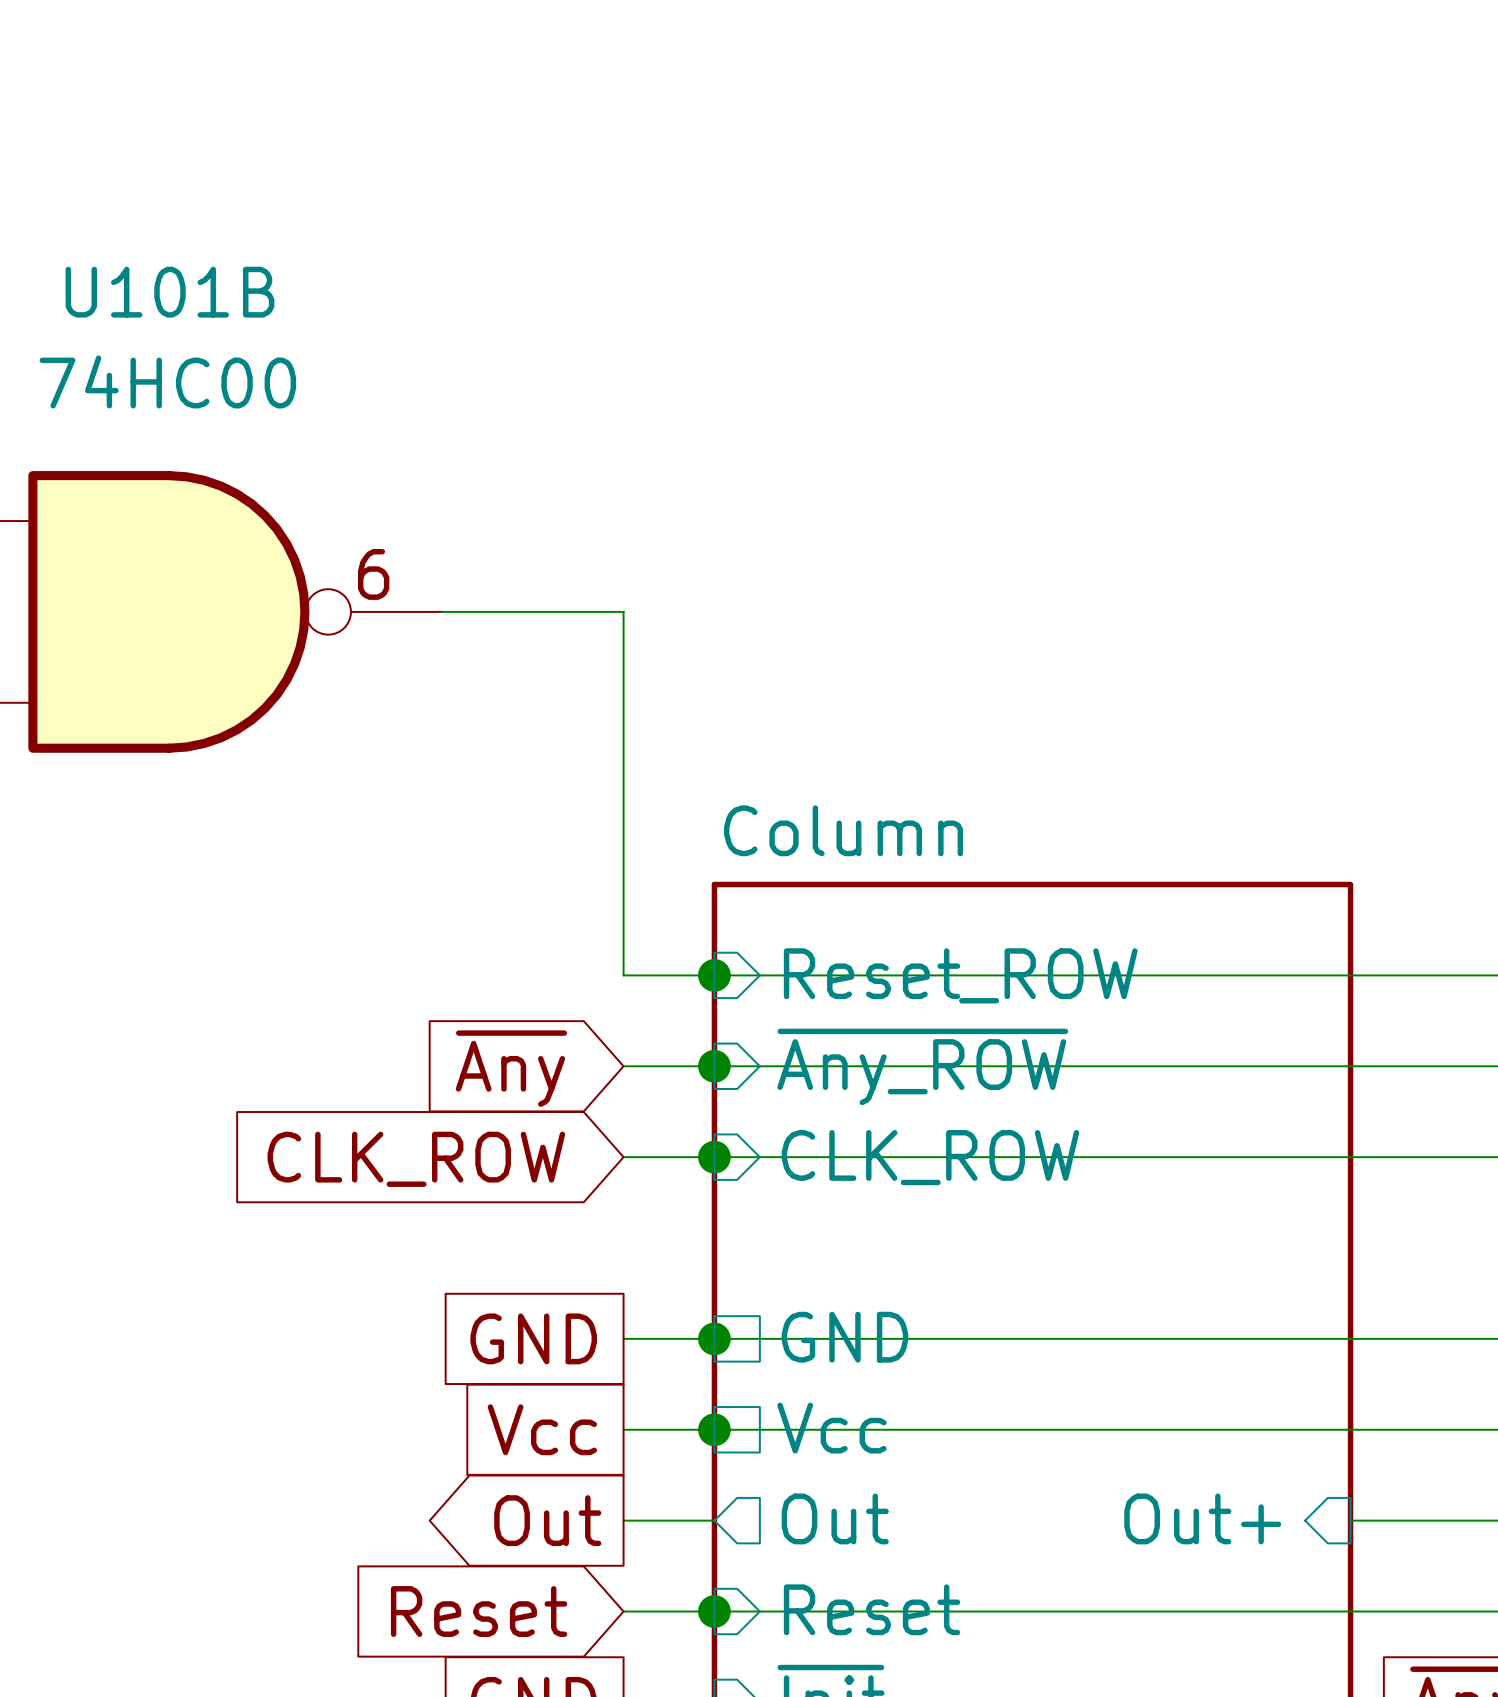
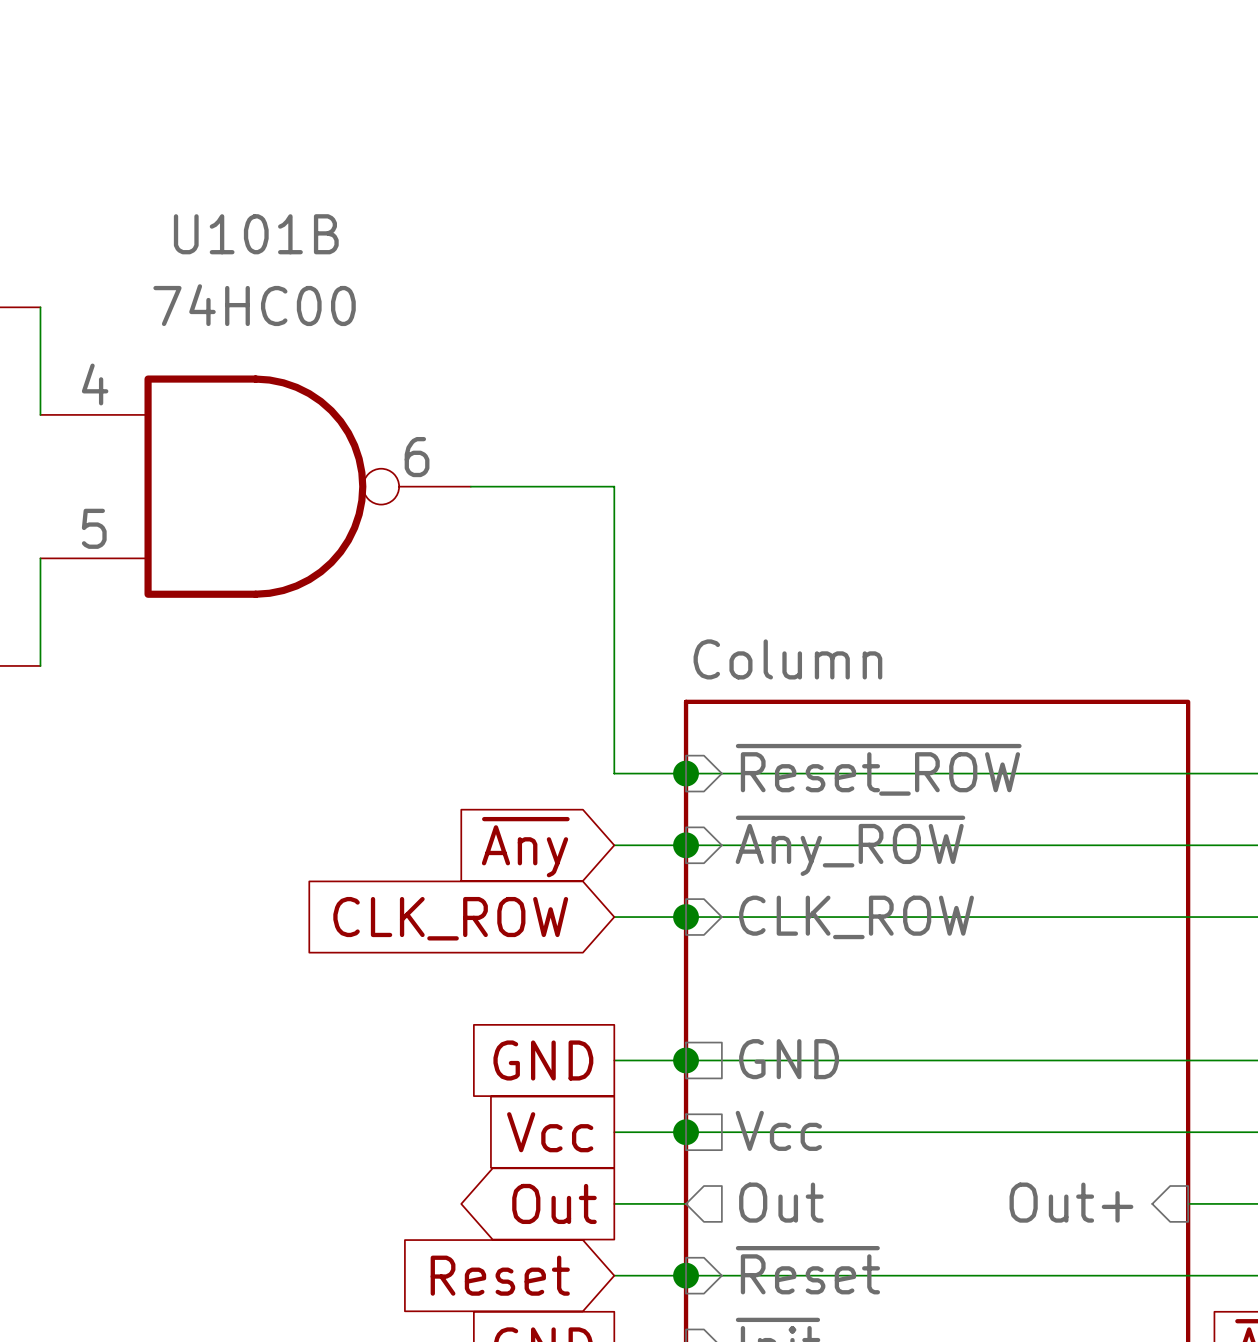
sheet pin: Reset_ROW (960, 975) -> ~{Reset_ROW} (878, 769)
sheet pin: Reset (872, 1609) -> ~{Reset} (807, 1270)

